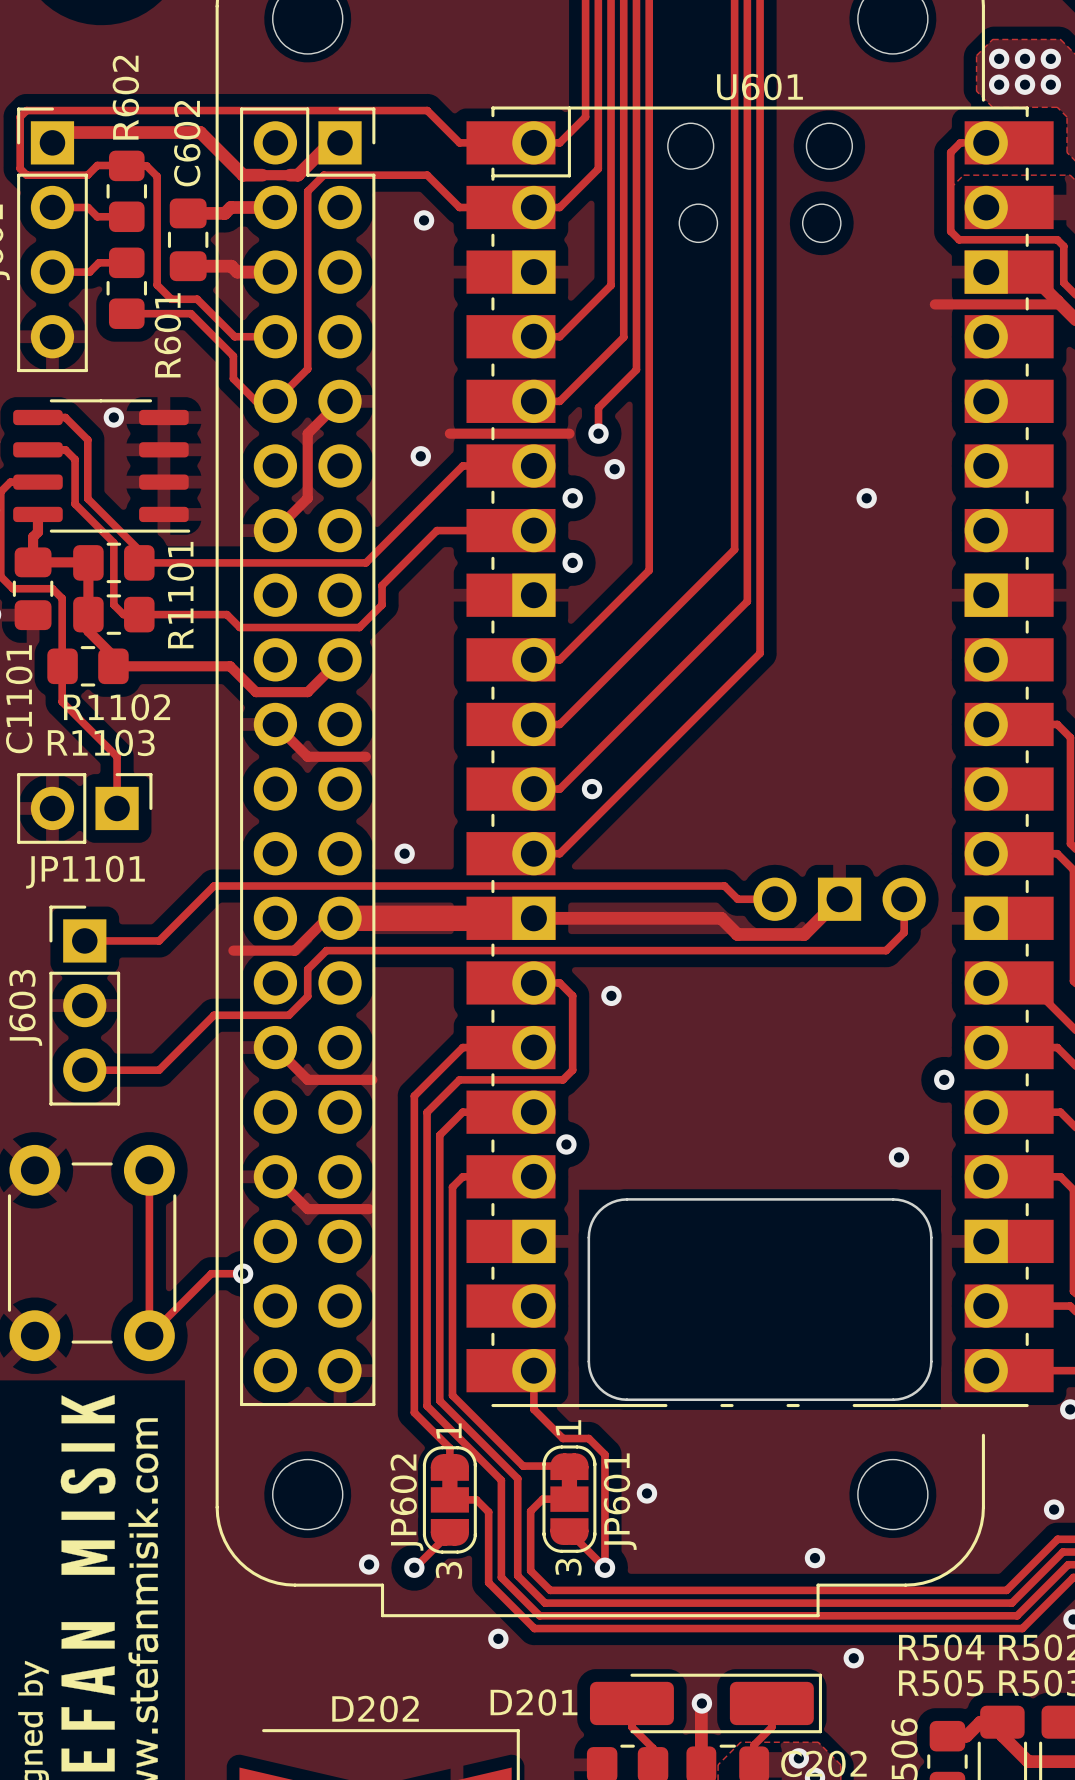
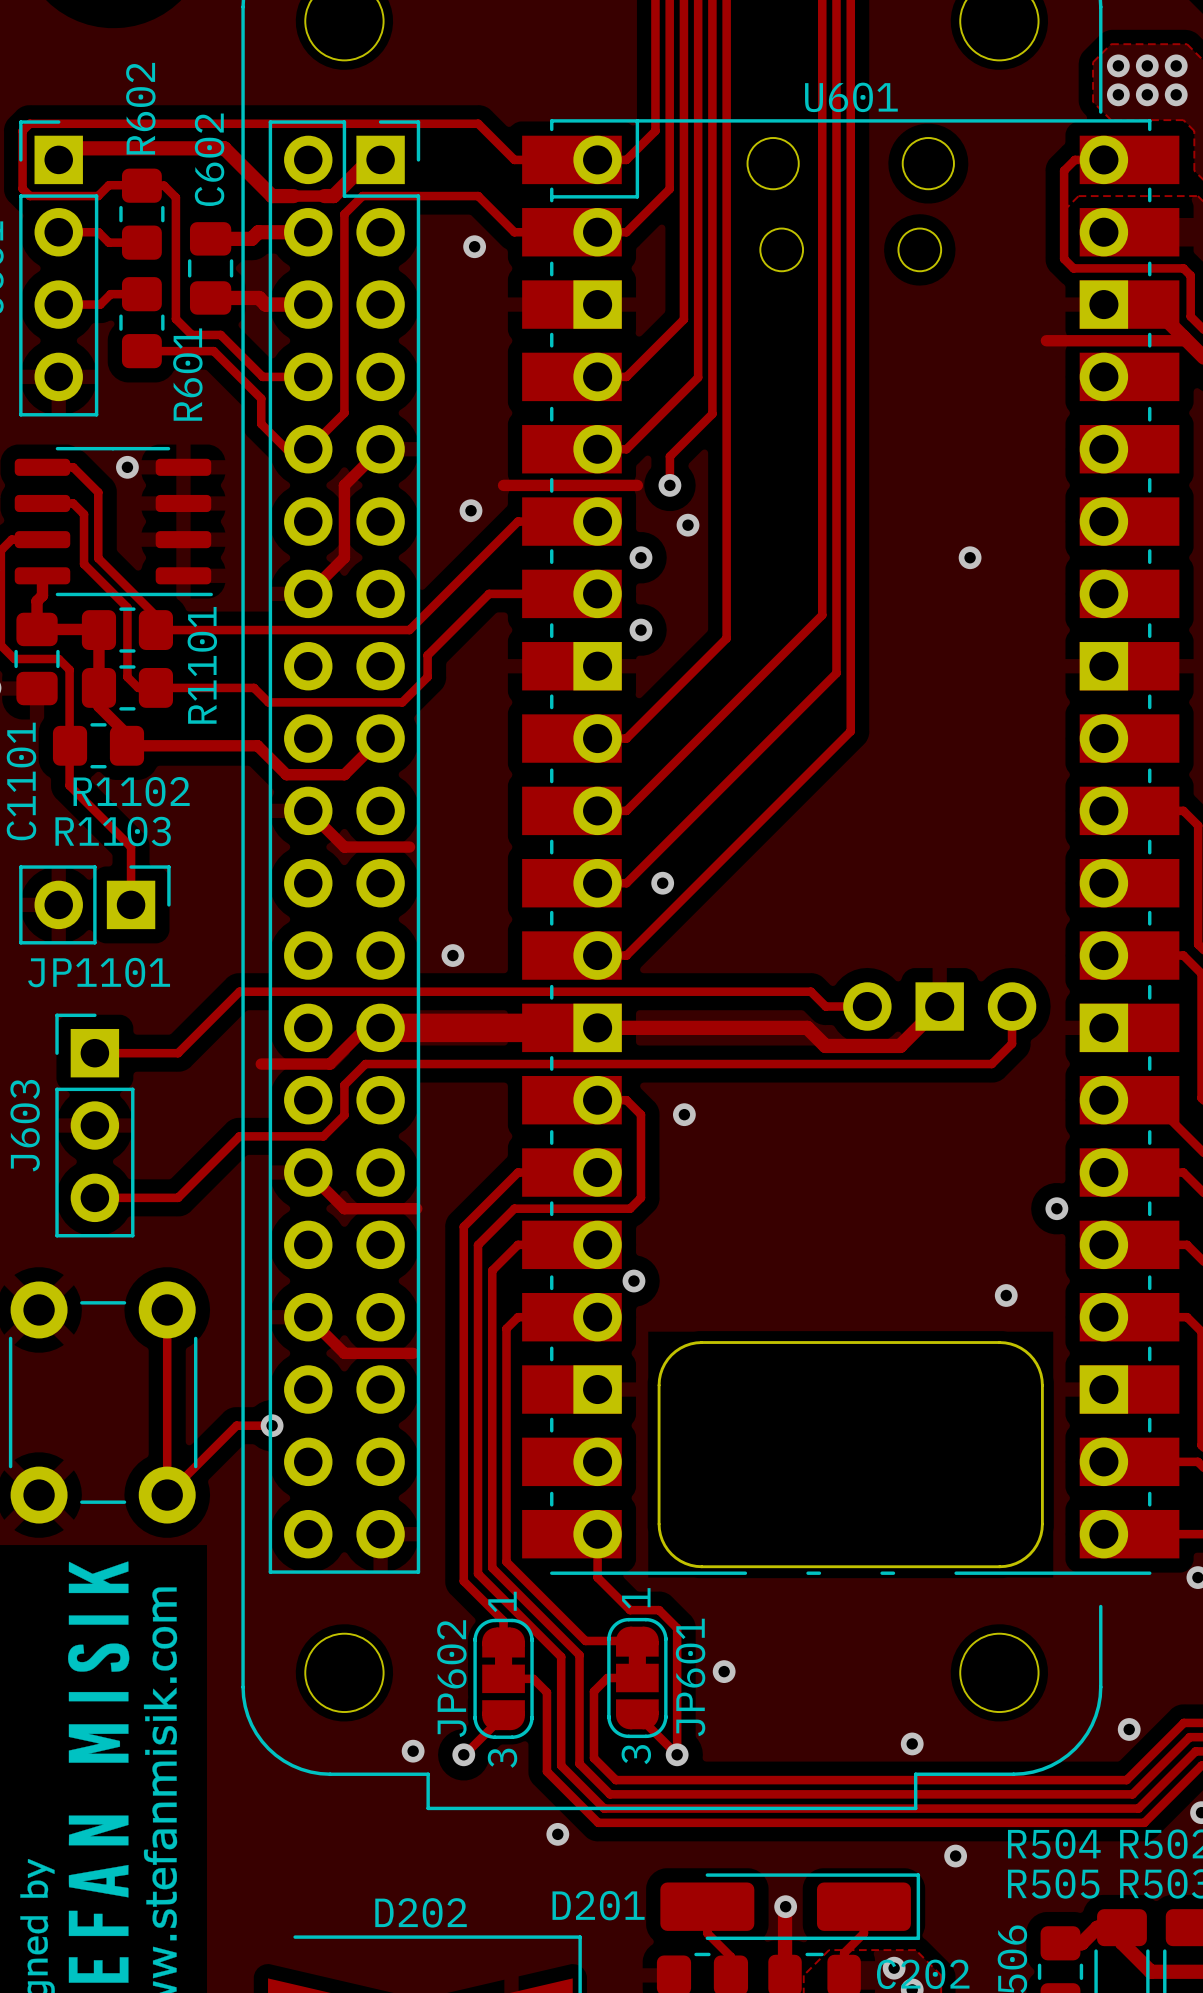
via position: (1054, 1509) -> (1129, 1729)

